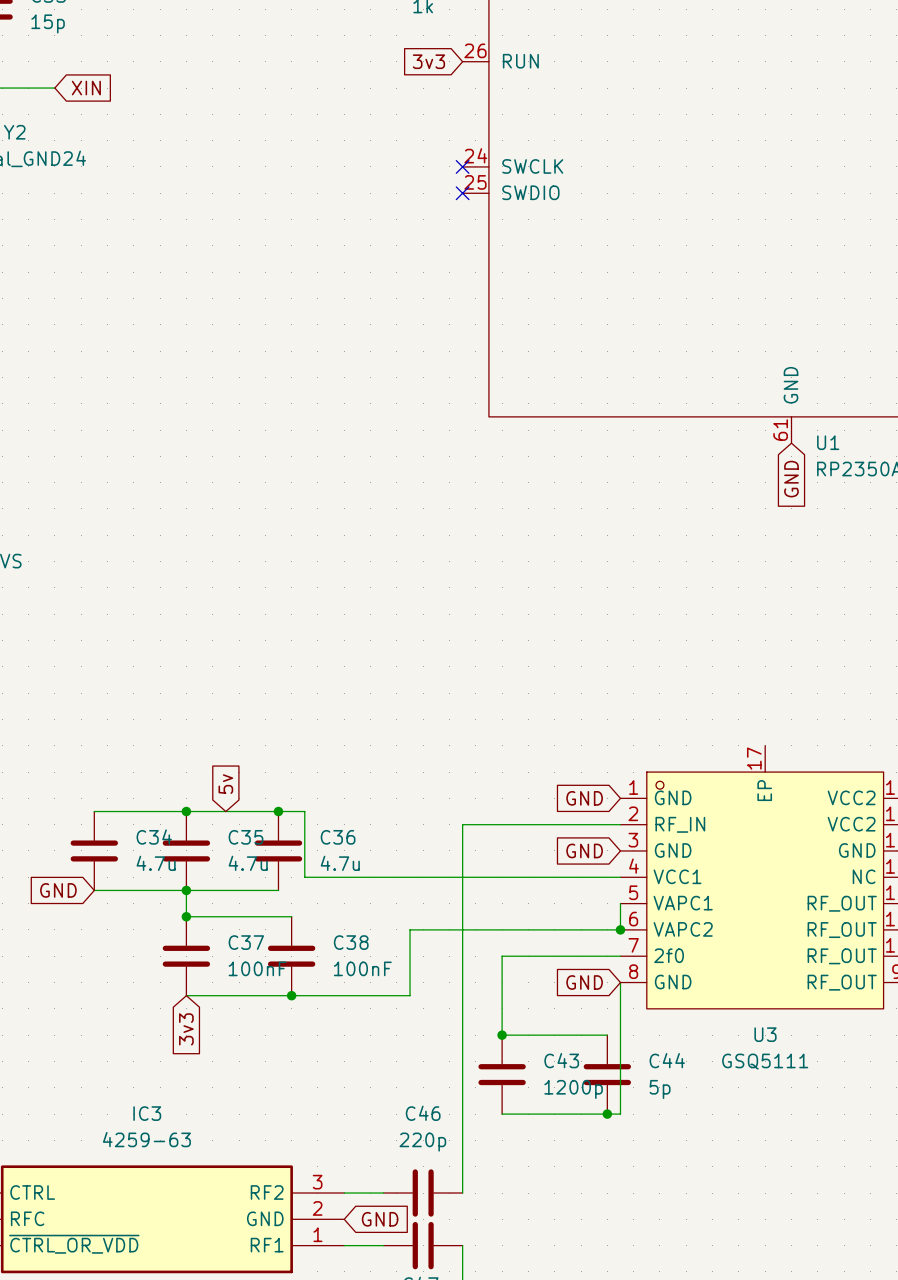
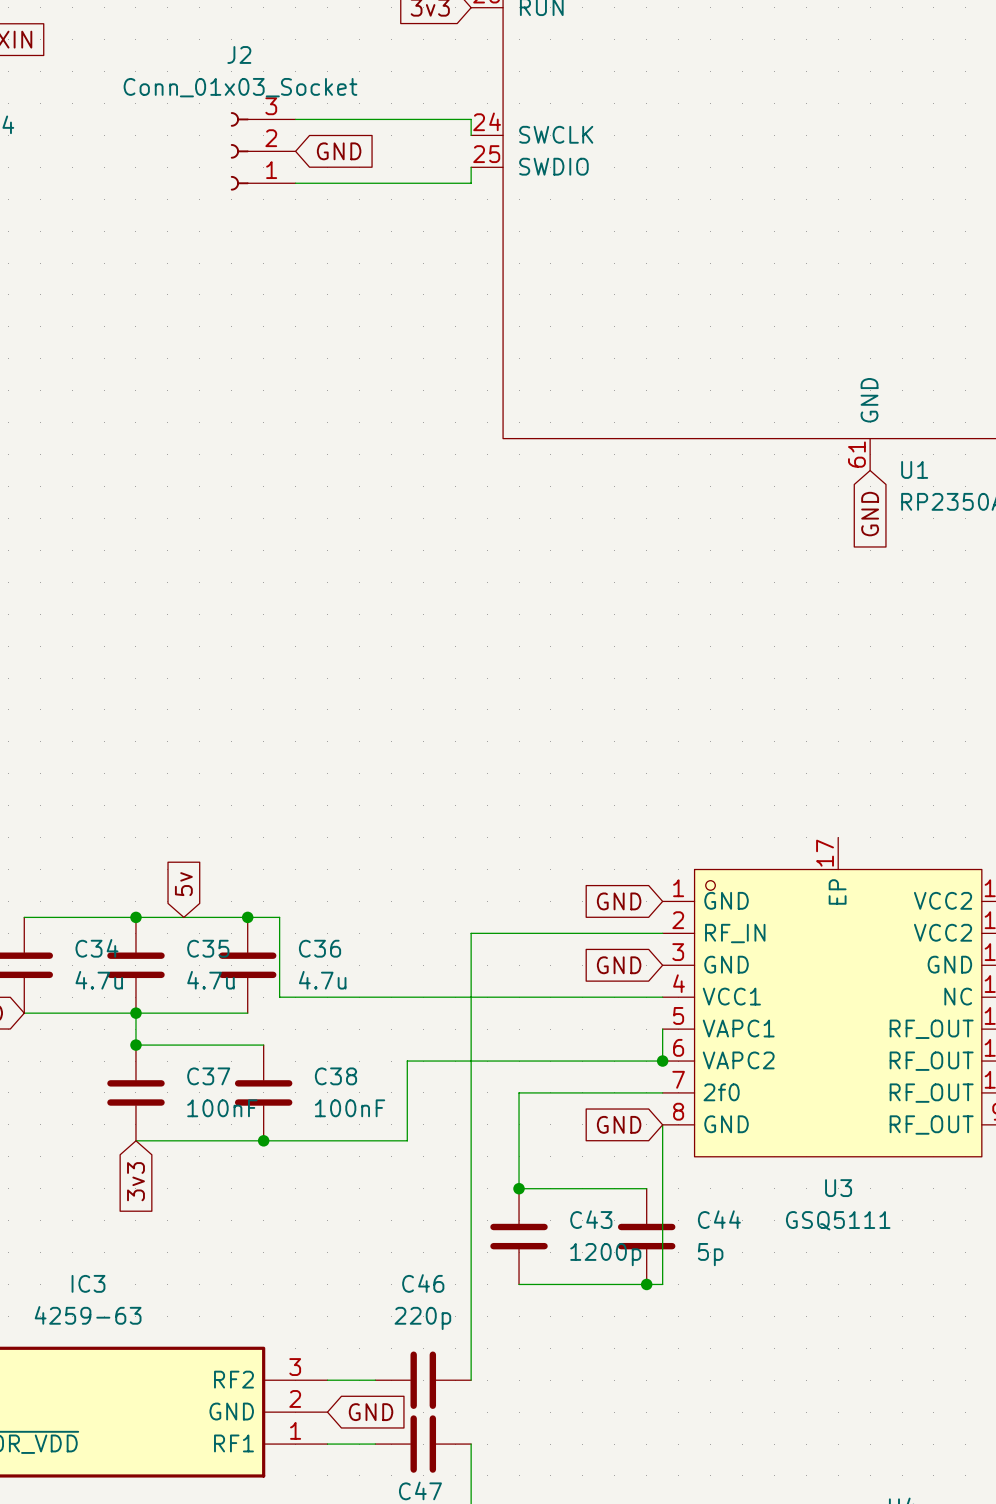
wire: none -> (295, 119) (471, 119) (471, 135)
no-connect mark: (462, 166) -> none
J2: none -> Conn_01x03_Socket (263, 151)
global label: none -> GND (339, 151)
wire: none -> (471, 167) (471, 183) (295, 183)
no-connect mark: (462, 193) -> none

